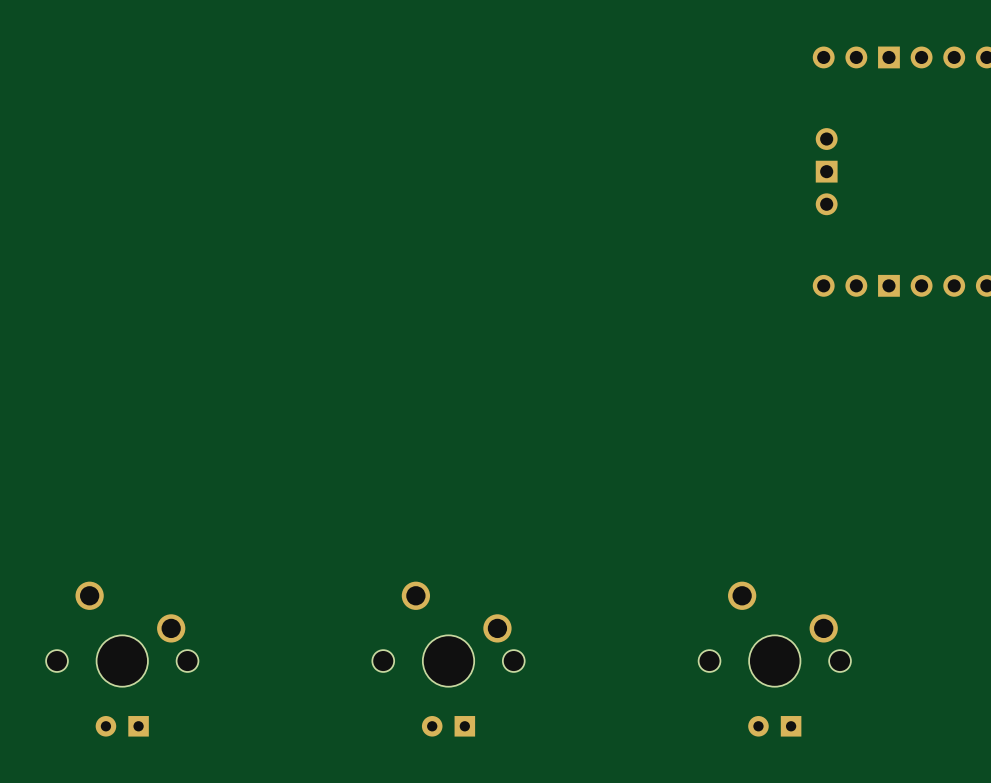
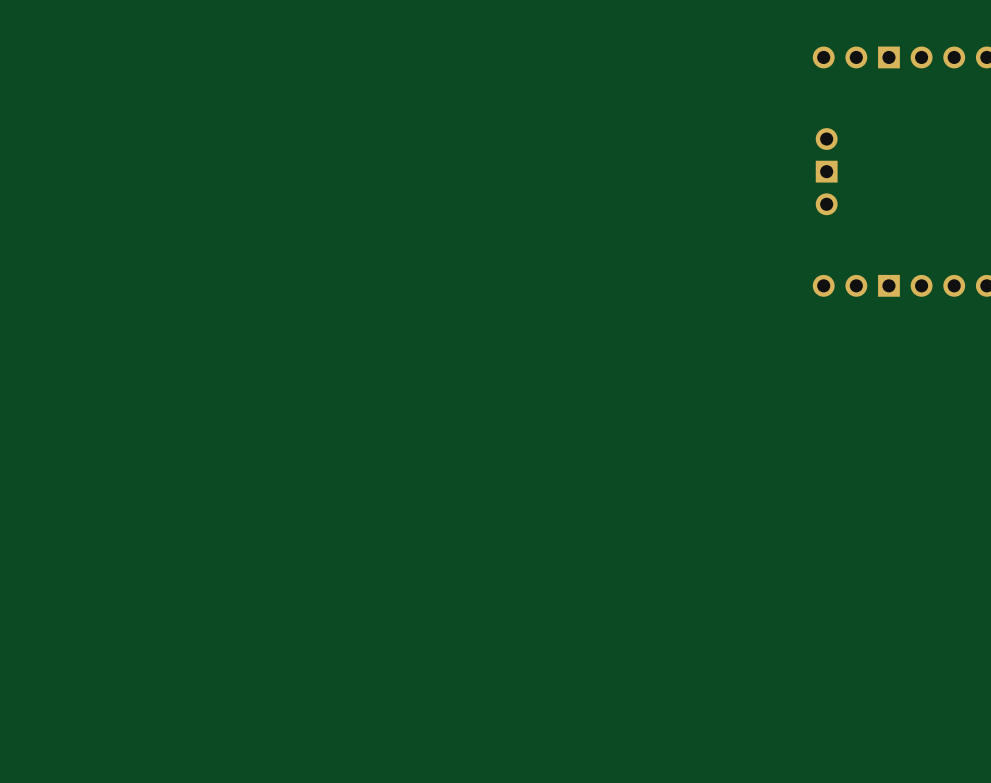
part: (122, 659) -> none
part: (448, 659) -> none
part: (774, 659) -> none

